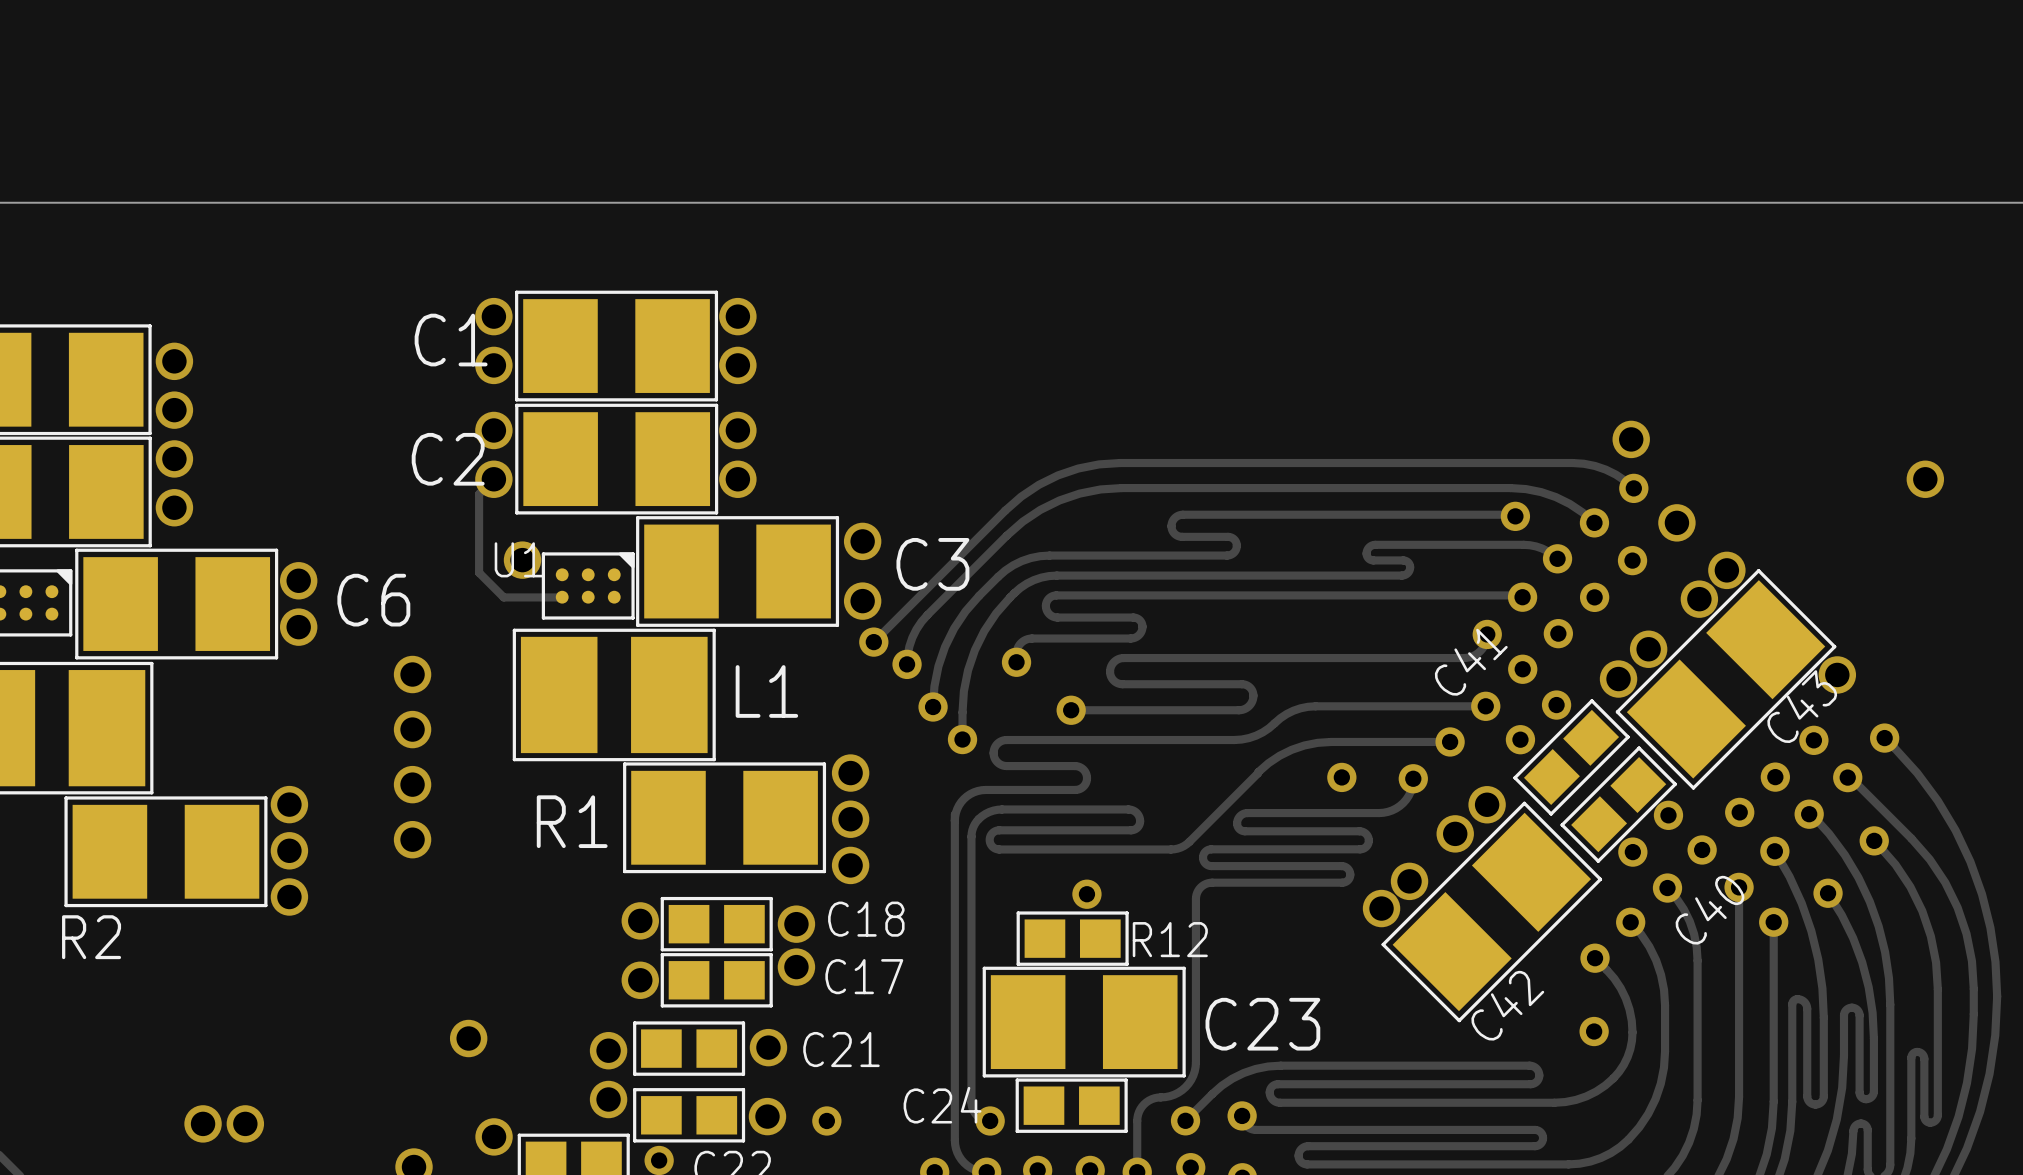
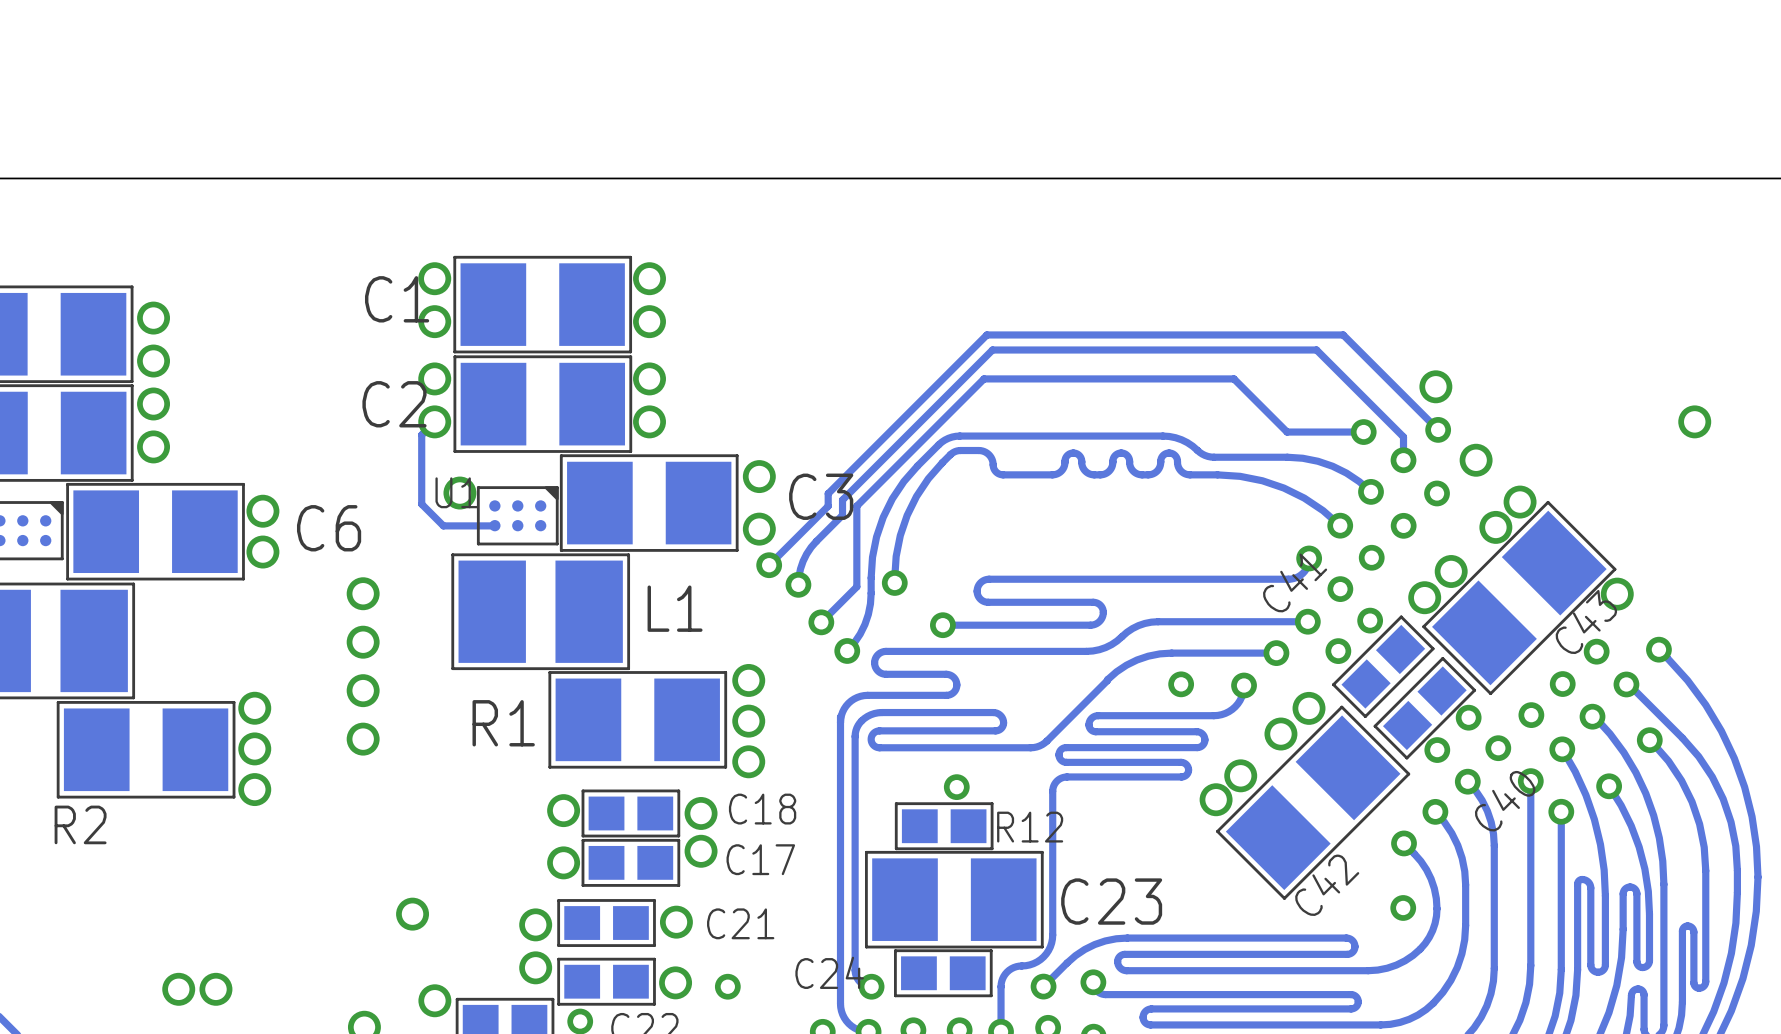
track: (1633, 488) (1605, 469) (1572, 463) (1099, 464) (1058, 475) (1021, 496) (940, 575) -> (1438, 429) (1343, 334) (986, 334) (828, 493) (828, 506)
track: (1515, 516) (1513, 514) (1181, 514) (1175, 517) (1171, 523) (1171, 528) (1175, 534) (1182, 536) (1230, 537) (1236, 543) (1234, 551) (1227, 555) (1049, 555) (1030, 558) (1013, 565) (998, 576) (965, 611) (954, 628) (938, 666) (933, 707) -> (1363, 432) (1287, 432) (1233, 378) (984, 378) (856, 506) (856, 586) (821, 622)
via position: (1515, 516) -> (1363, 432)
track: (1594, 522) (1582, 512) (1555, 497) (1525, 489) (1100, 489) (1059, 500) (1022, 521) (957, 585) -> (1403, 460) (1403, 436) (1316, 350) (992, 350) (842, 500) (842, 515)
track: none -> (1081, 461) (1079, 455) (1073, 453) (1067, 455) (1064, 461)
track: none -> (1129, 461) (1127, 455) (1121, 453) (1115, 455) (1112, 461)
track: none -> (1177, 461) (1175, 455) (1169, 453) (1163, 455) (1160, 461)
track: none -> (1112, 462) (1109, 471) (1100, 474) (1086, 472) (1081, 462)
track: none -> (1160, 462) (1157, 471) (1148, 474) (1134, 472) (1129, 462)
track: none -> (1177, 462) (1180, 469) (1186, 474) (1240, 476) (1283, 488) (1323, 510) (1340, 525)
track: (1557, 558) (1542, 548) (1530, 545) (1375, 544) (1367, 550) (1366, 555) (1369, 559) (1405, 560) (1409, 565) (1408, 572) (1401, 575) (1056, 575) (1041, 577) (1026, 583) (1010, 597) (996, 613) (974, 650) (963, 691) (962, 739) -> (1371, 491) (1346, 473) (1317, 461) (1287, 457) (1211, 457) (1202, 454) (1181, 439) (1169, 436) (952, 437) (938, 444) (903, 481) (883, 517) (872, 557) (868, 614) (860, 634) (847, 650)
track: (1522, 597) (1520, 595) (1055, 595) (1048, 598) (1045, 604) (1047, 611) (1053, 616) (1134, 617) (1141, 622) (1141, 631) (1137, 636) (1132, 638) (1029, 638) (1019, 644) (1016, 653) -> (1064, 462) (1062, 469) (1054, 474) (1001, 474) (995, 470) (991, 457) (984, 451) (960, 450) (951, 453) (928, 478) (907, 515) (896, 556) (894, 577)

